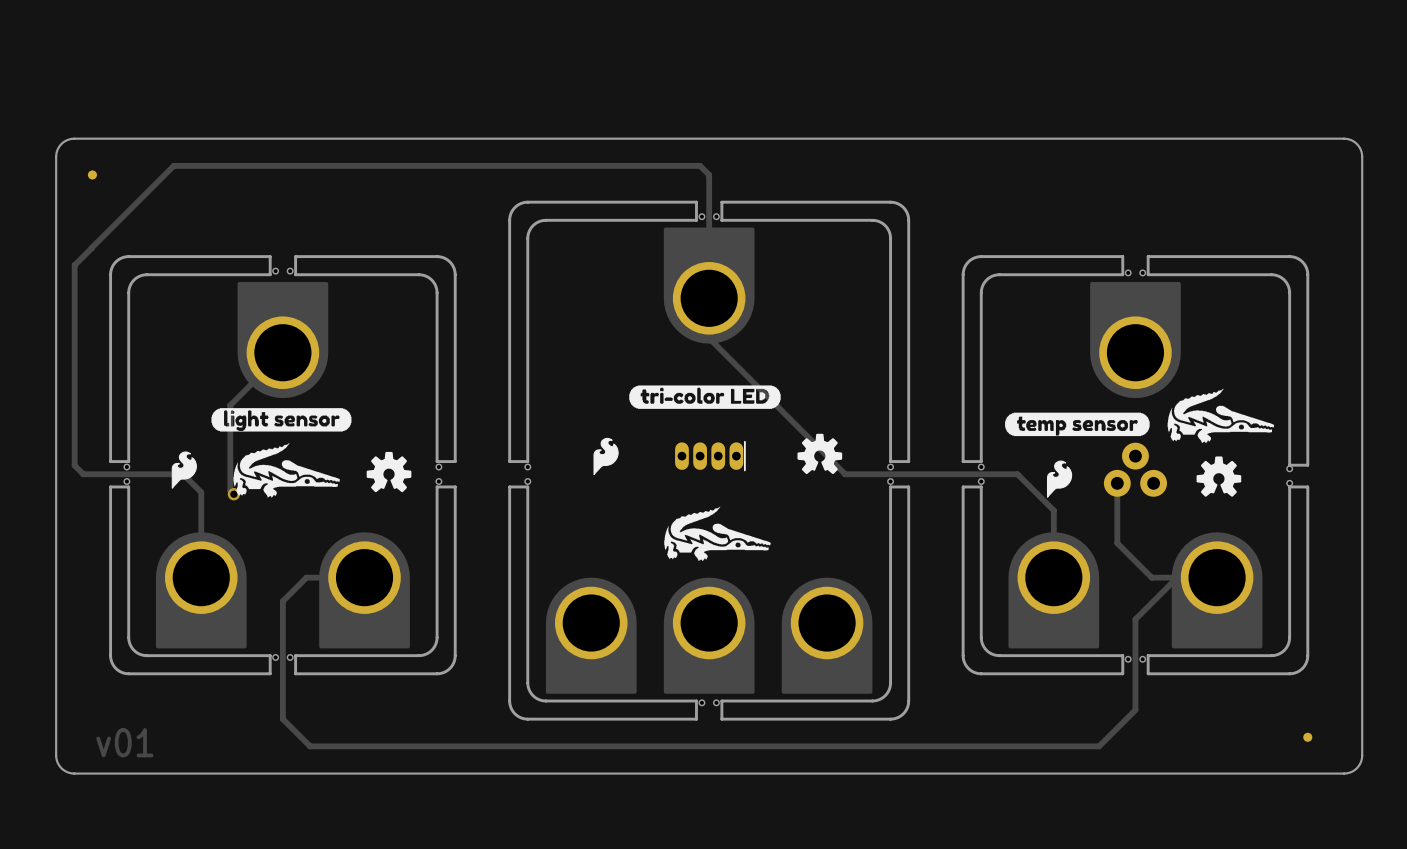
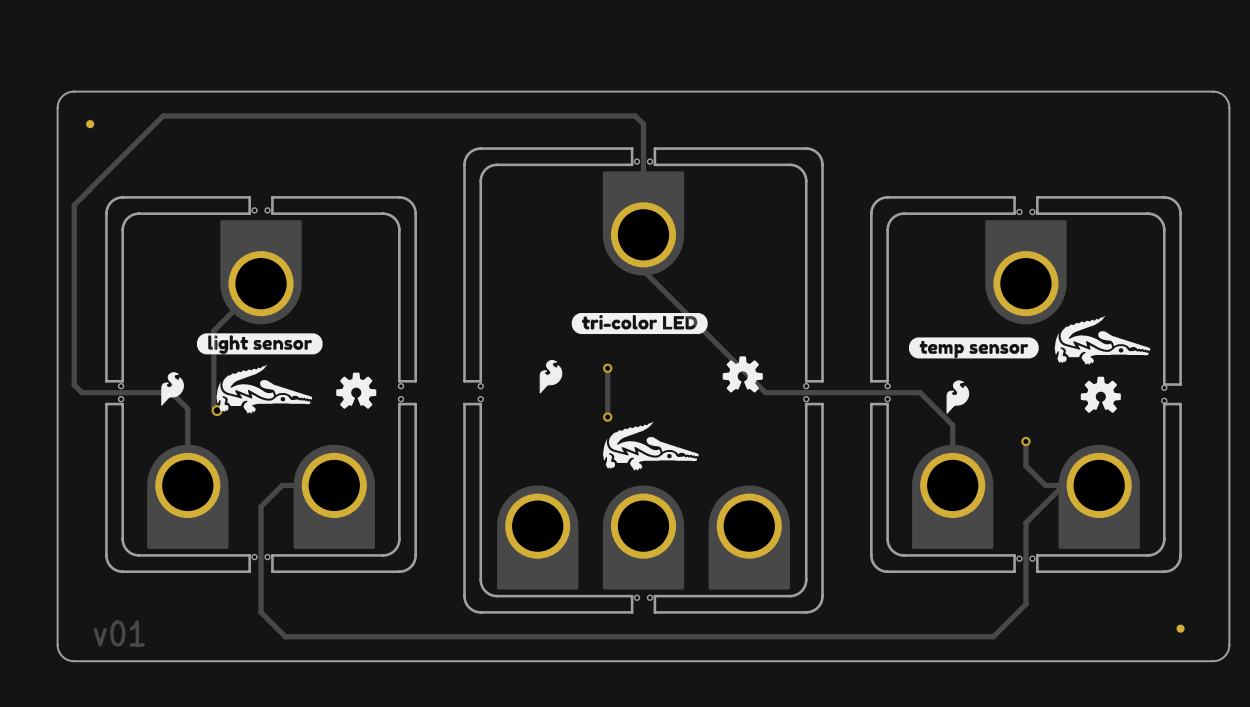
track: none -> (607, 368) (607, 417)
via: none -> (607, 368)
part: (710, 456) -> none
part: (1135, 469) -> none
track: (1117, 483) (1117, 543) (1151, 577) (1157, 577) -> (1025, 441) (1025, 465) (1045, 485)
via: none -> (607, 417)
via: none -> (1025, 441)

